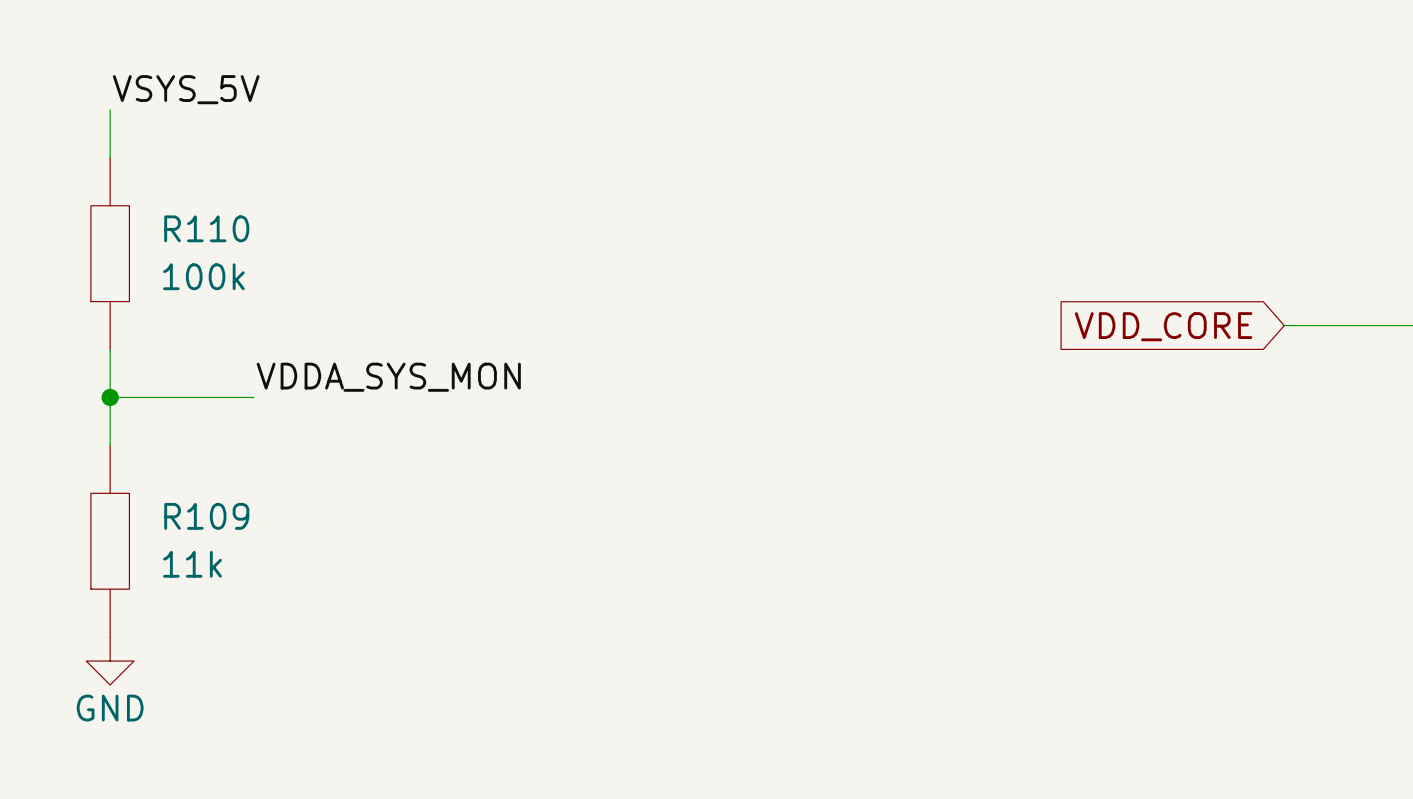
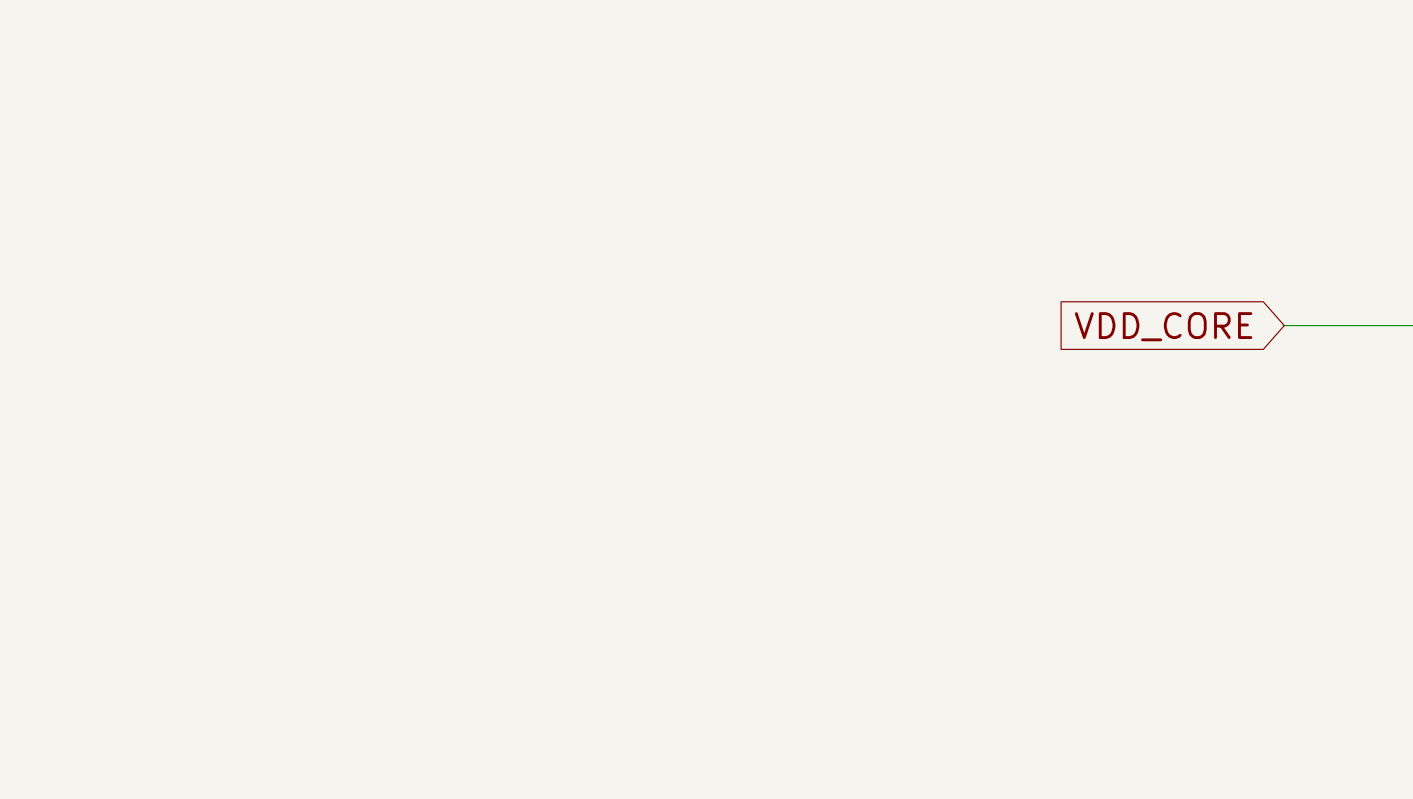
label: VSYS_5V (186, 89) -> none
wire: (110, 109) (110, 157) -> none
R110: (110, 253) -> none
wire: (110, 349) (110, 445) -> none
label: VDDA_SYS_MON (388, 377) -> none
wire: (110, 397) (253, 397) -> none
junction: (110, 397) -> none
R109: (110, 541) -> none
power symbol: GND (110, 661) -> none

